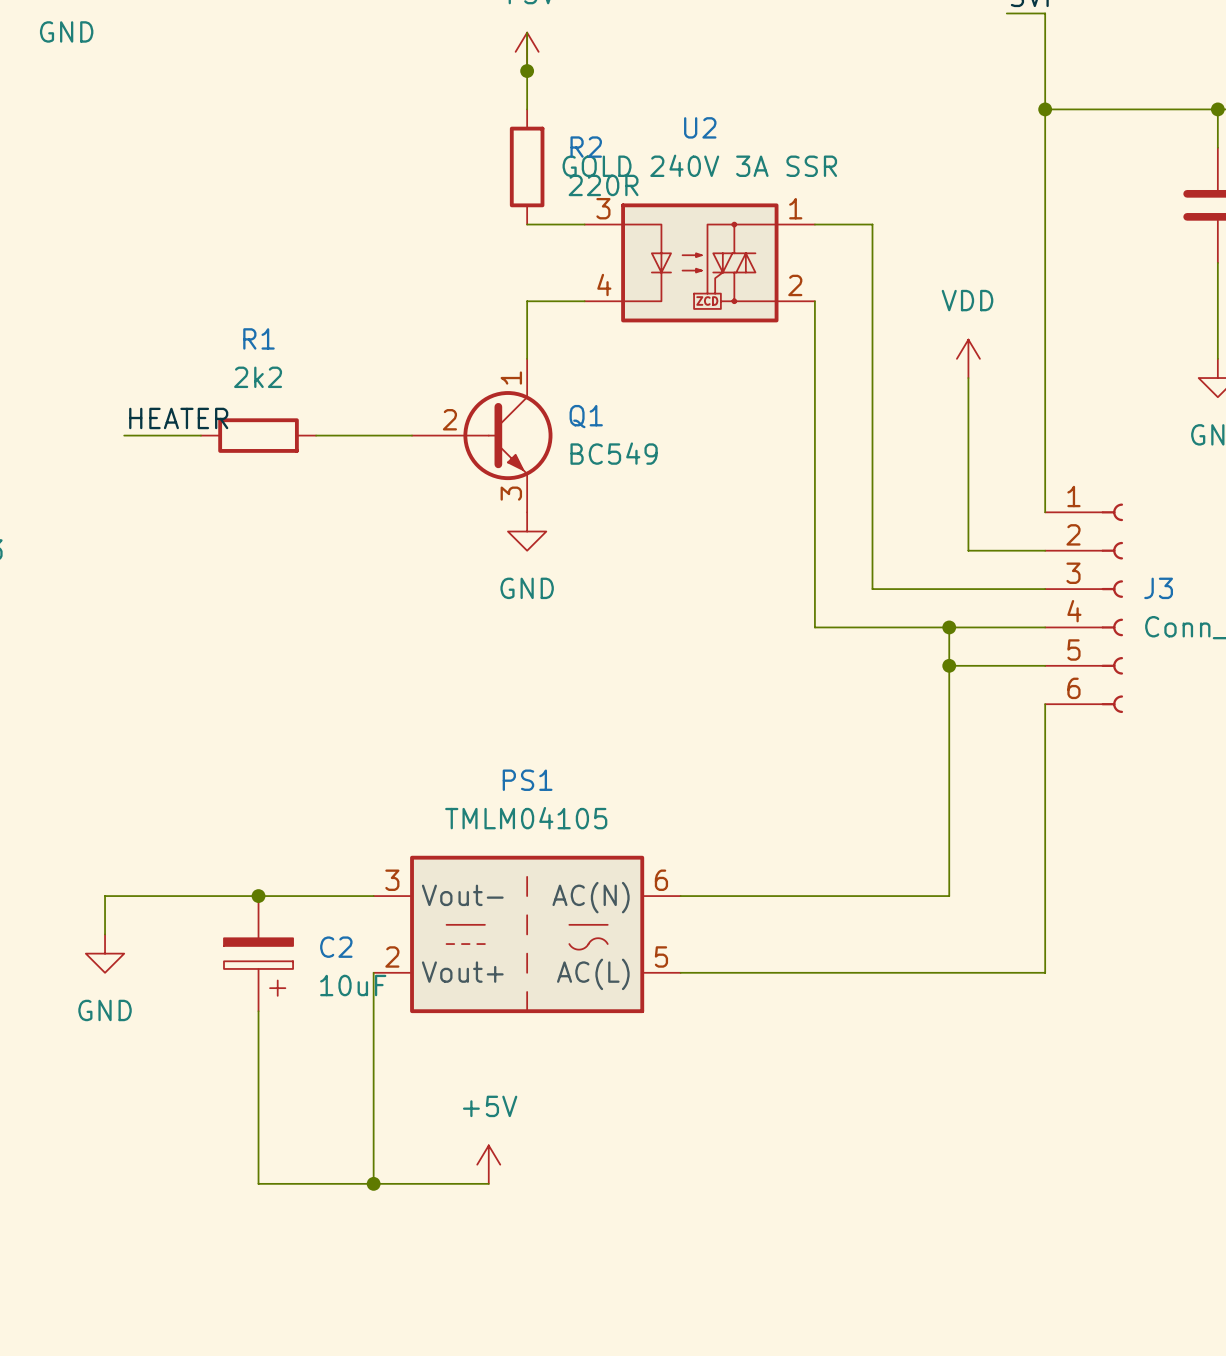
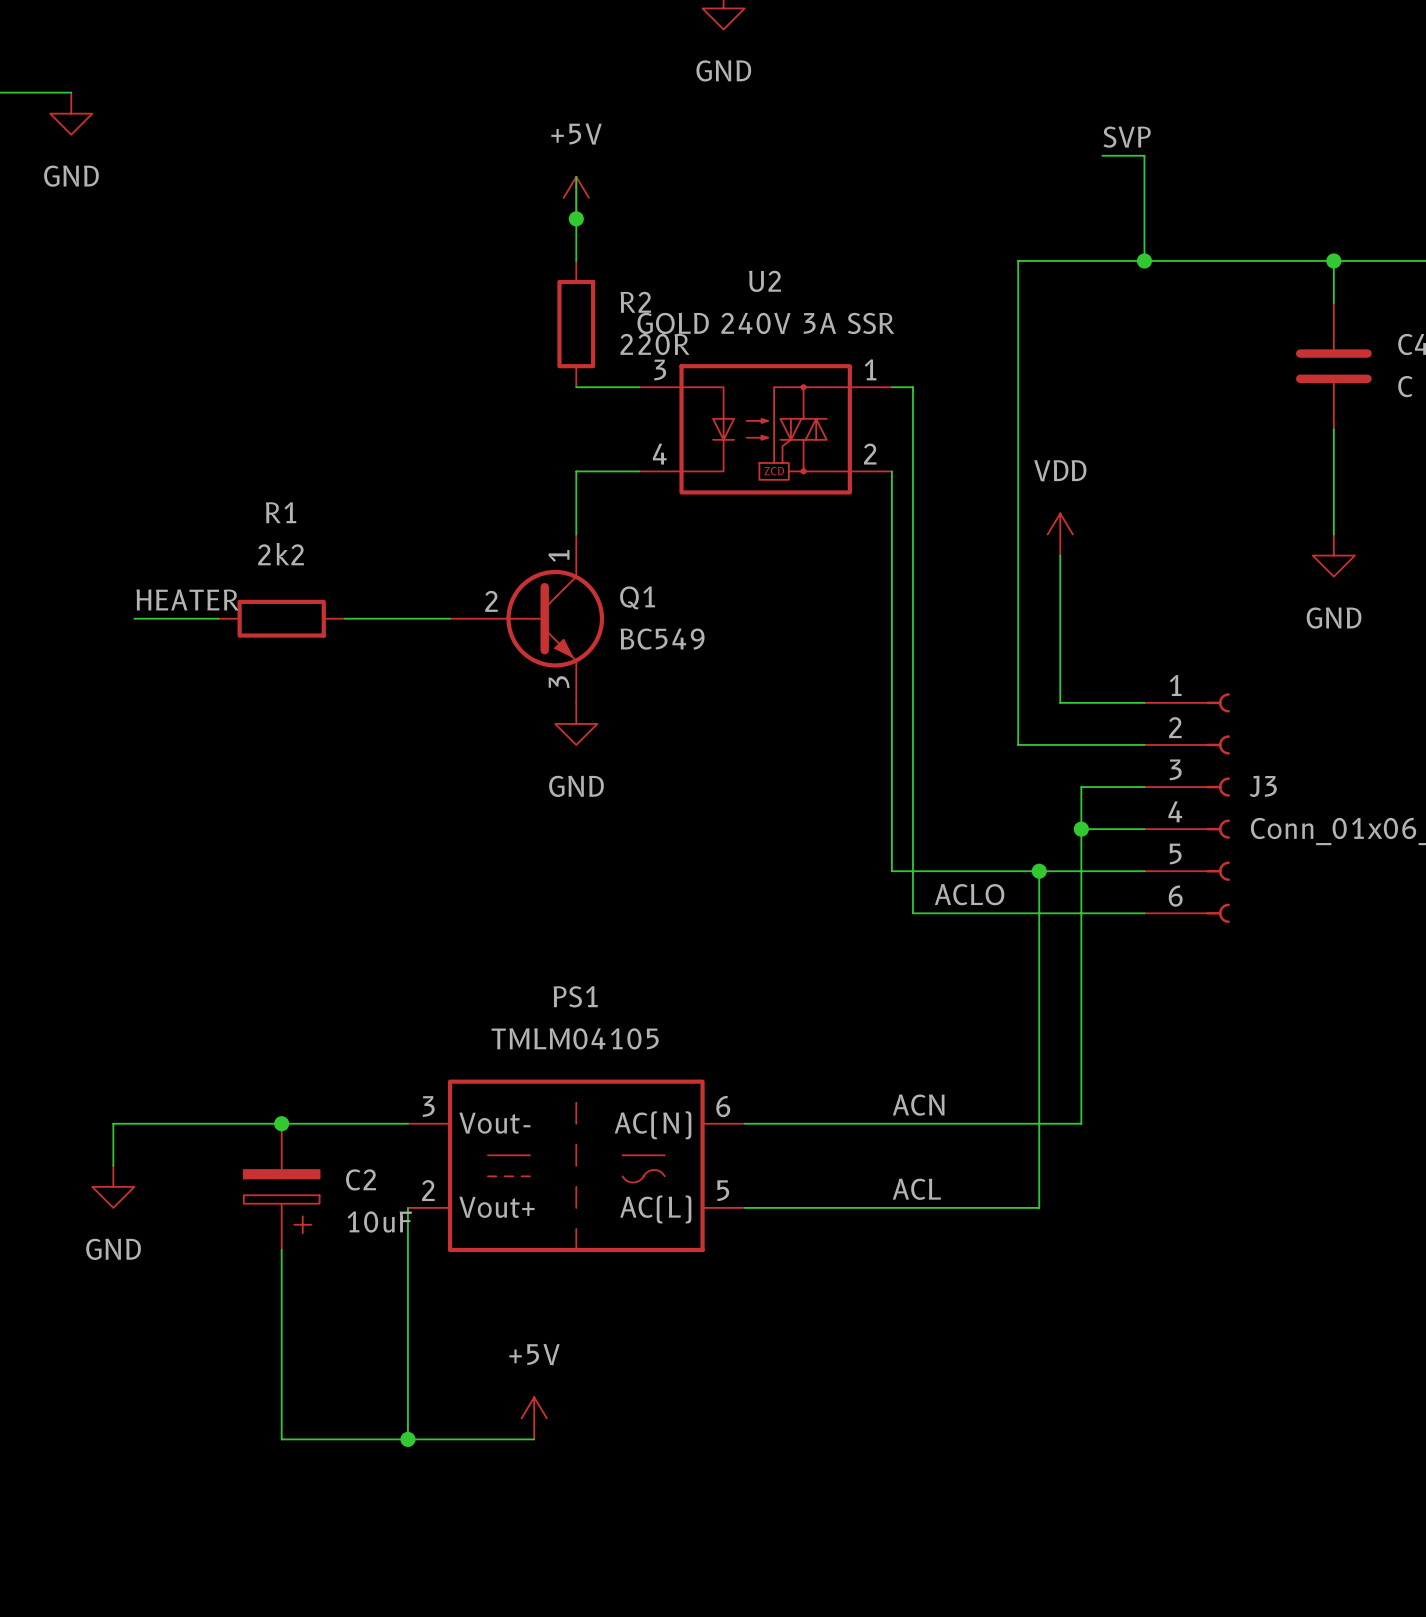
wire: (1045, 109) (1045, 512) -> (1144, 260) (1018, 260) (1018, 744) (1060, 744)
wire: (834, 224) (872, 224) (872, 589) (987, 589) -> (912, 387) (912, 913) (1144, 913)
wire: (968, 512) (968, 550) -> (1060, 702) (1144, 702)
wire: (814, 627) (987, 627) -> (891, 829) (891, 871) (1039, 871)
wire: (949, 627) (949, 665) -> none
junction position: (949, 627) -> (1081, 829)
label: none -> ACLO (969, 894)
wire: (1045, 704) (1045, 972) (949, 972) -> (1081, 787) (1081, 1123) (1039, 1123) (1039, 1207)
label: none -> ACN (918, 1105)
label: none -> ACL (916, 1189)

